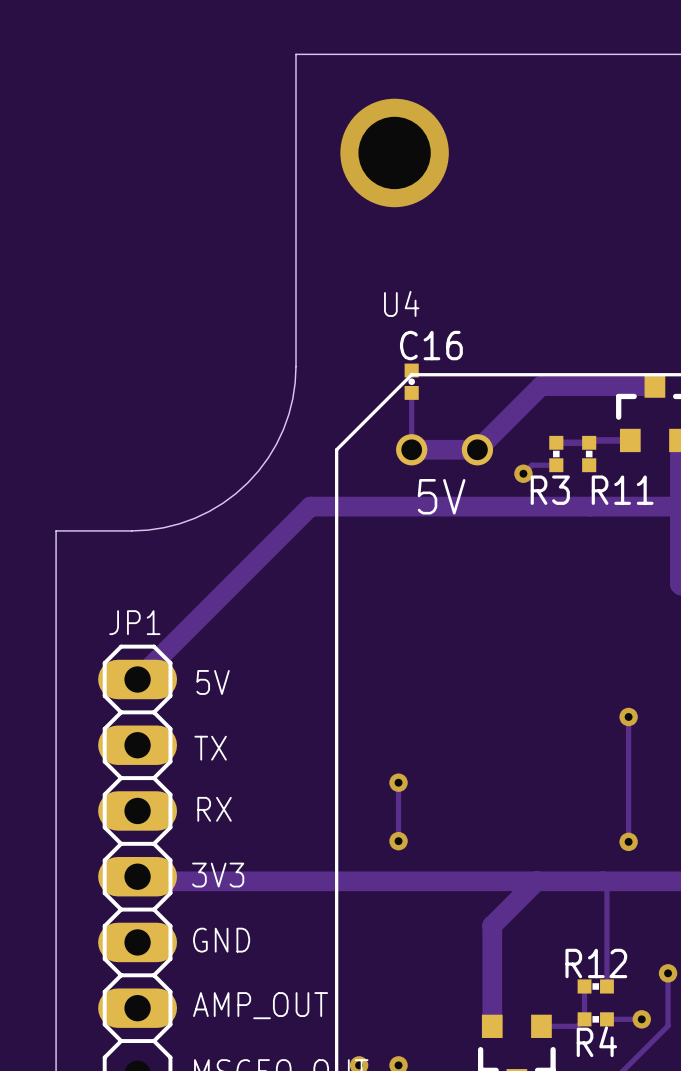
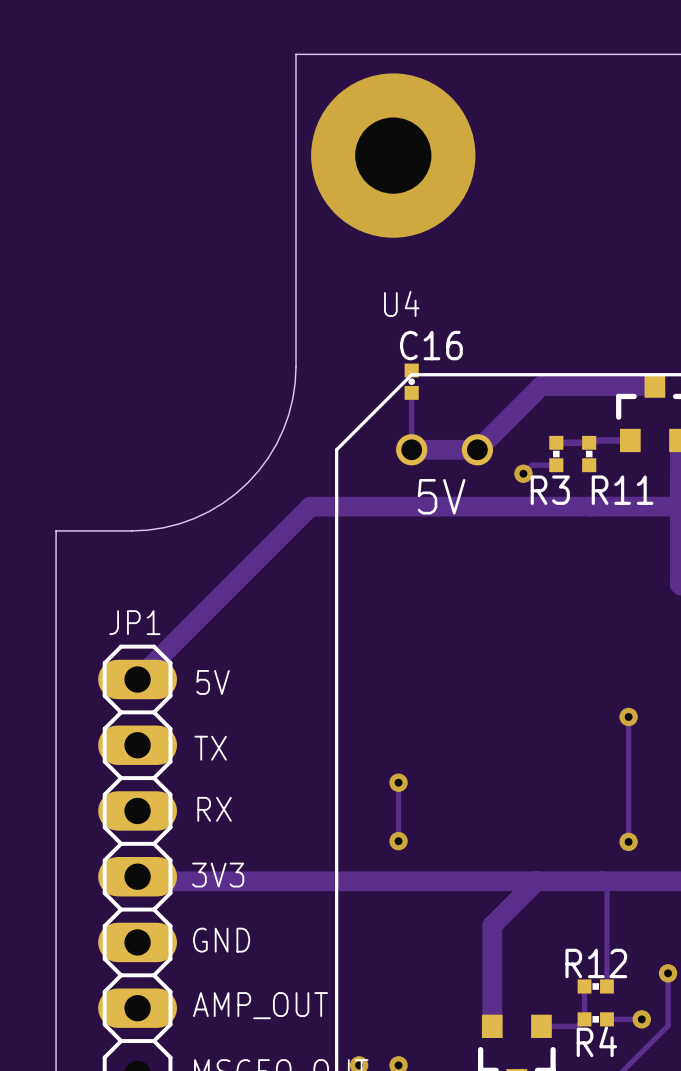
via size: [340, 98, 449, 208] -> [311, 73, 476, 238]

